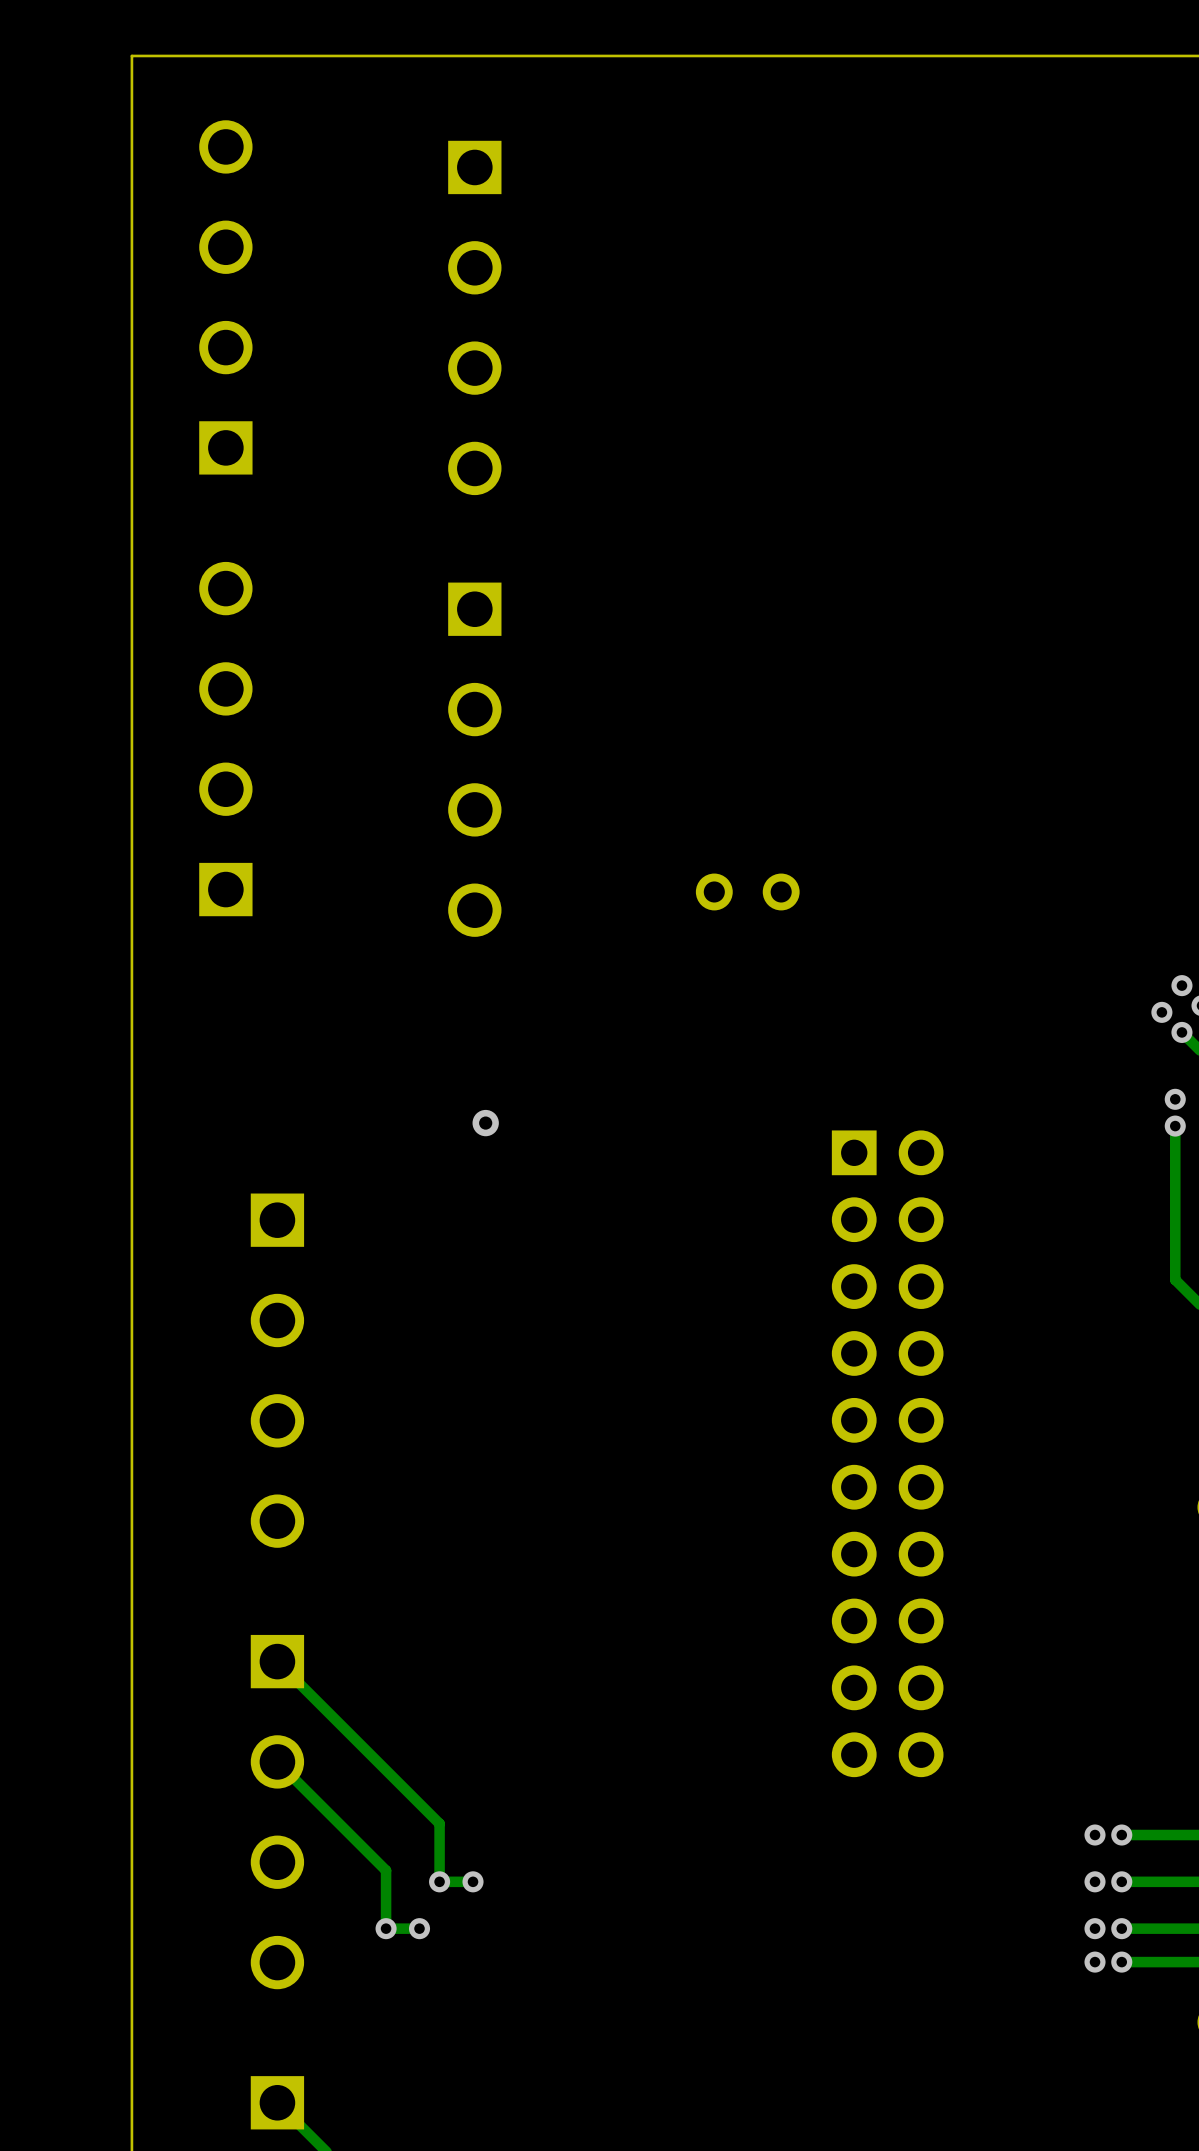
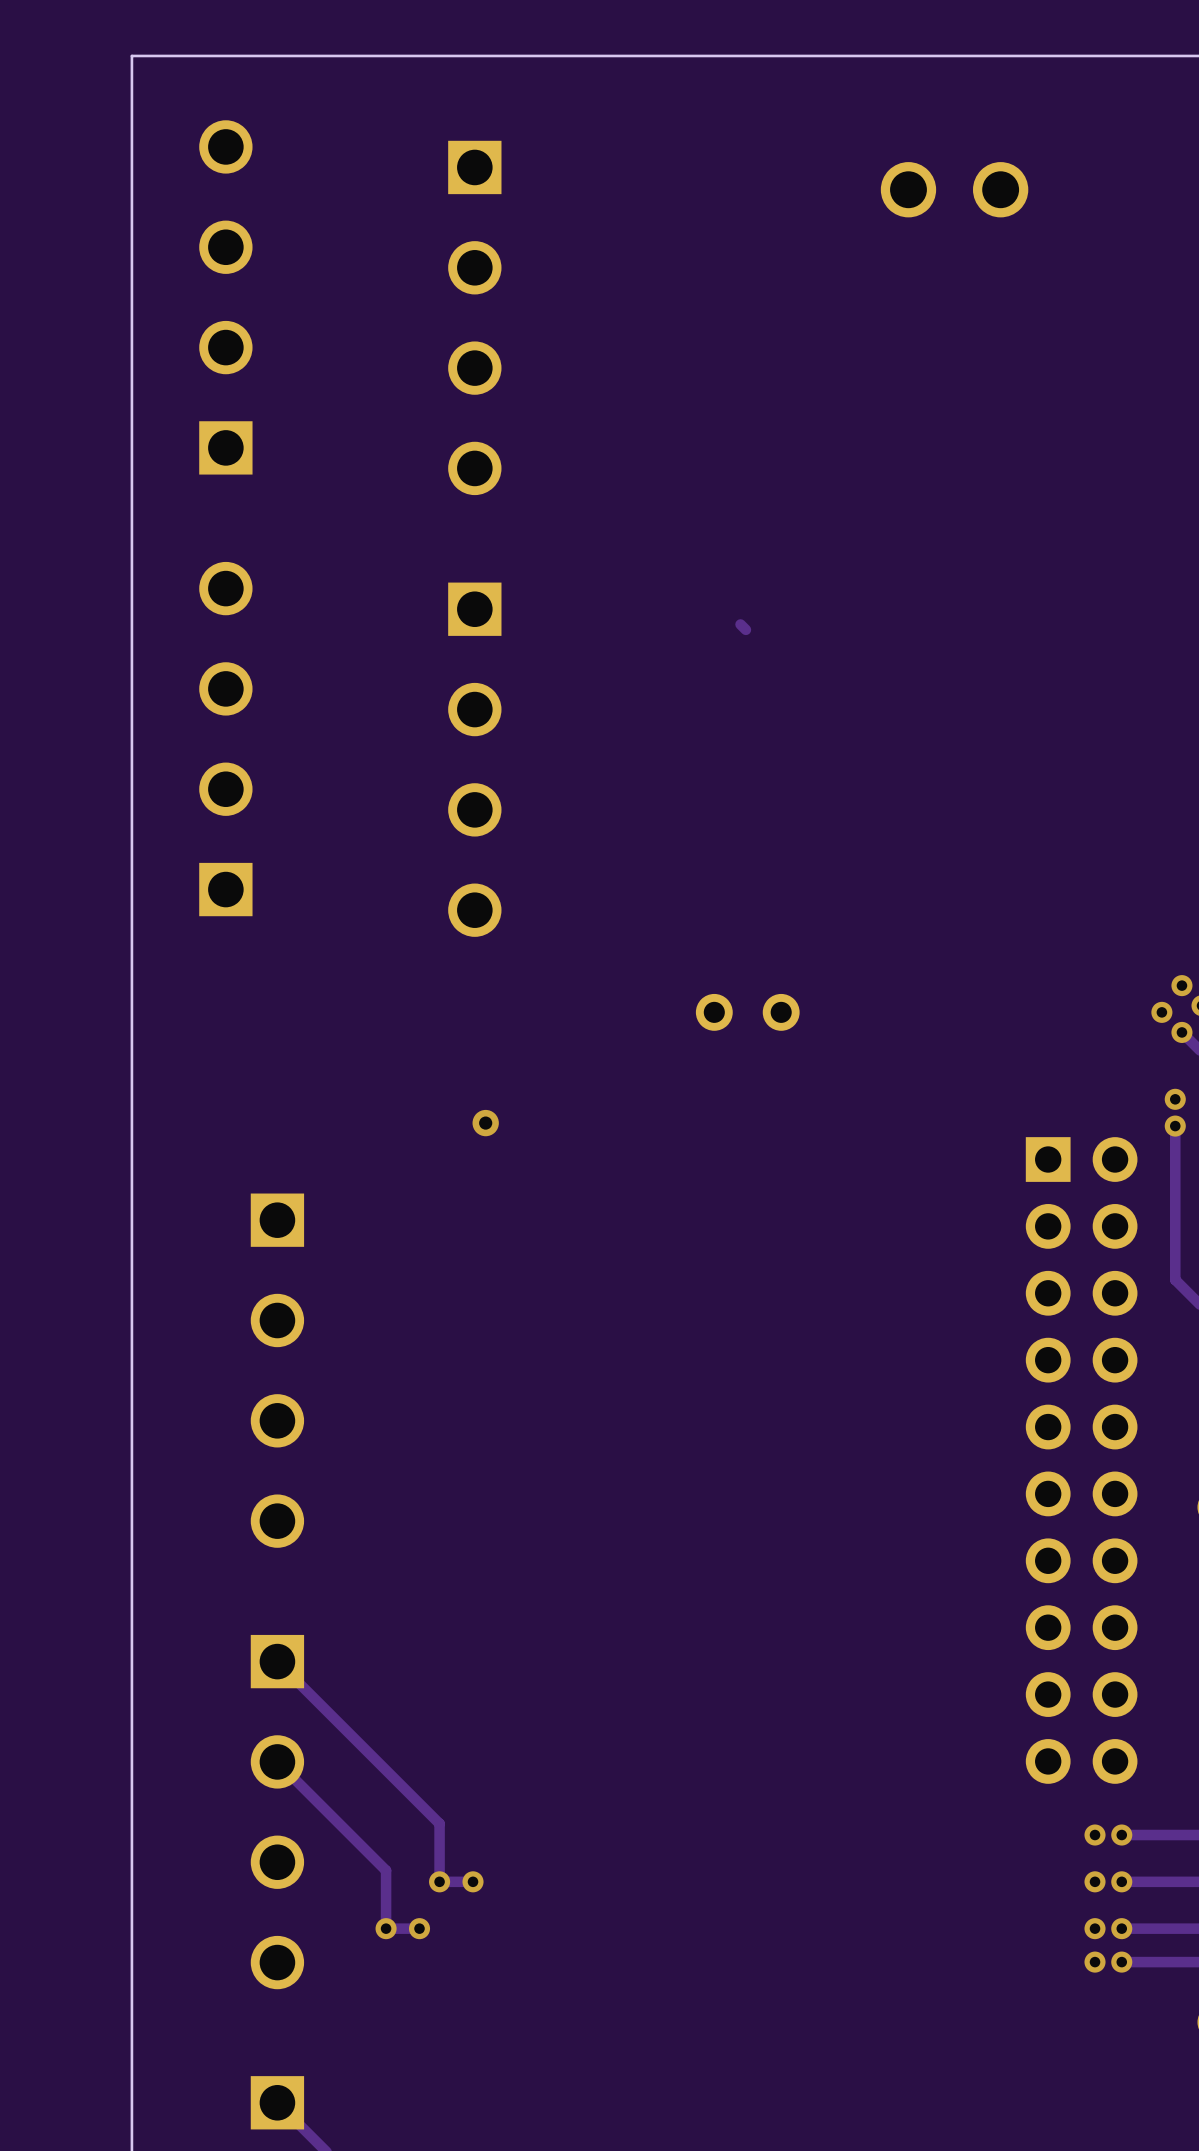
part: none -> (954, 189)
track: none -> (740, 624) (745, 629)
part position: (747, 891) -> (747, 1012)
part position: (887, 1453) -> (1081, 1460)

